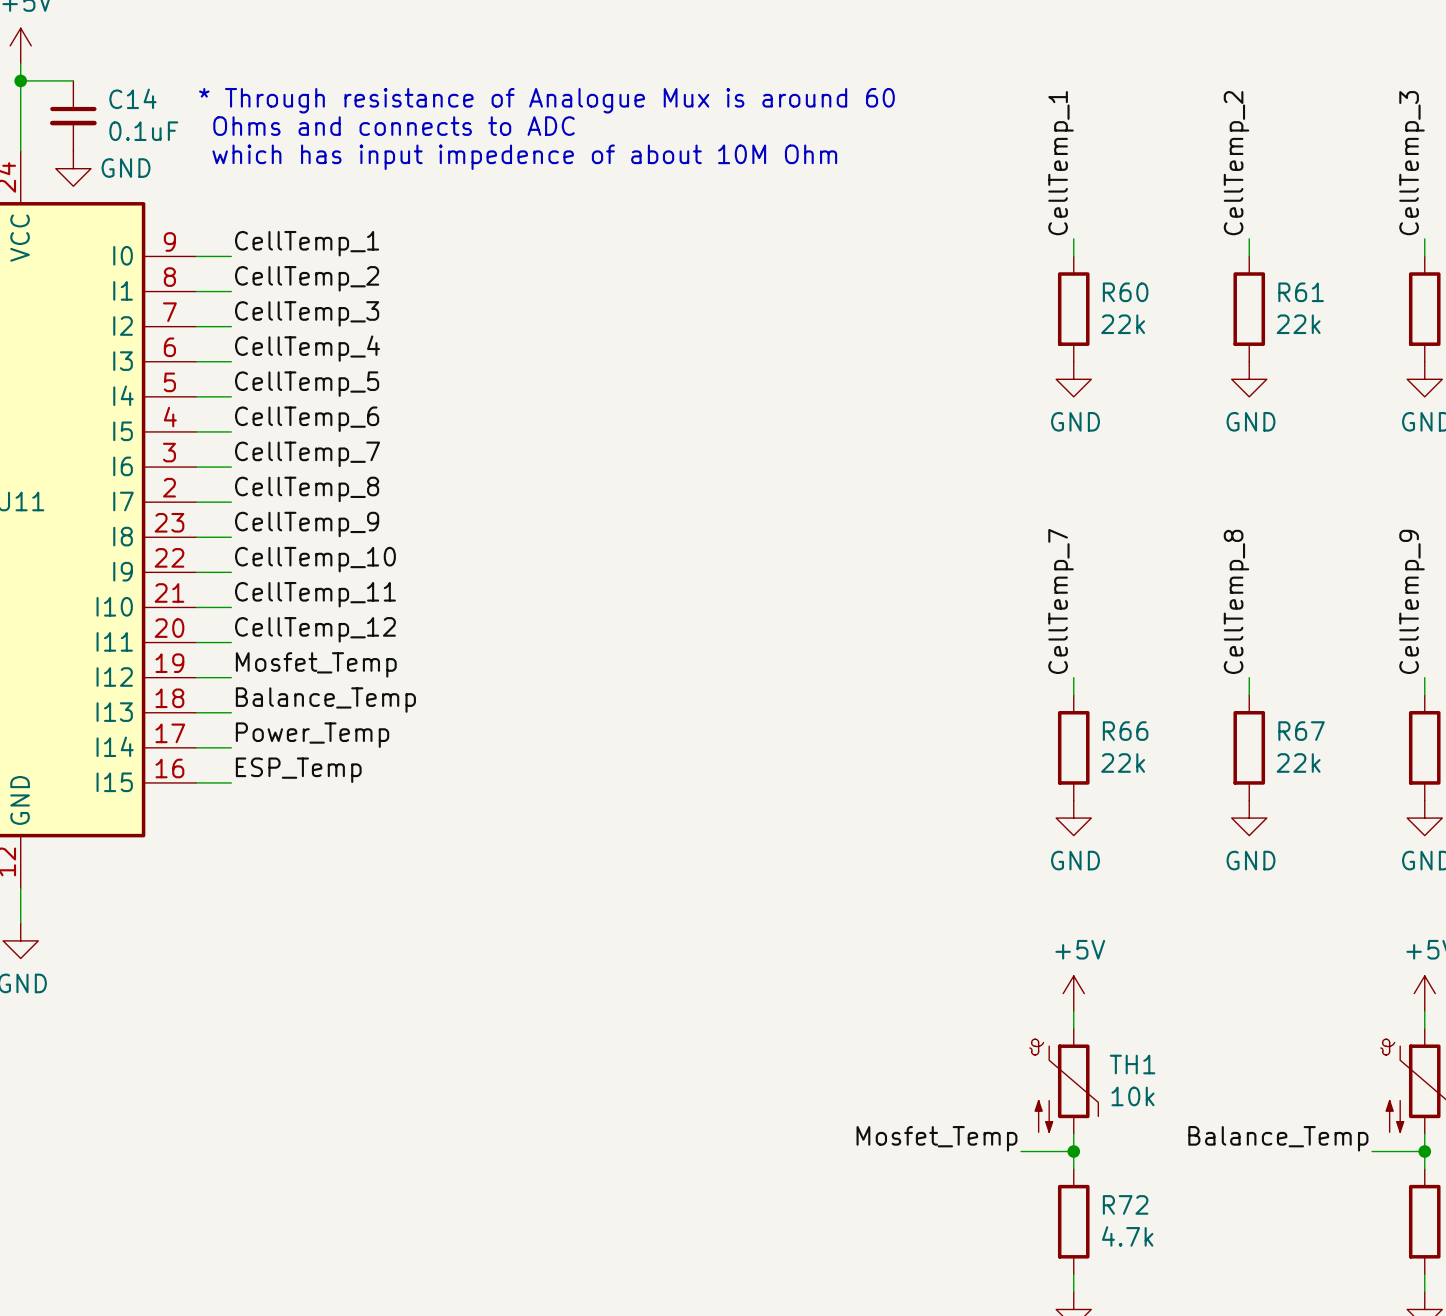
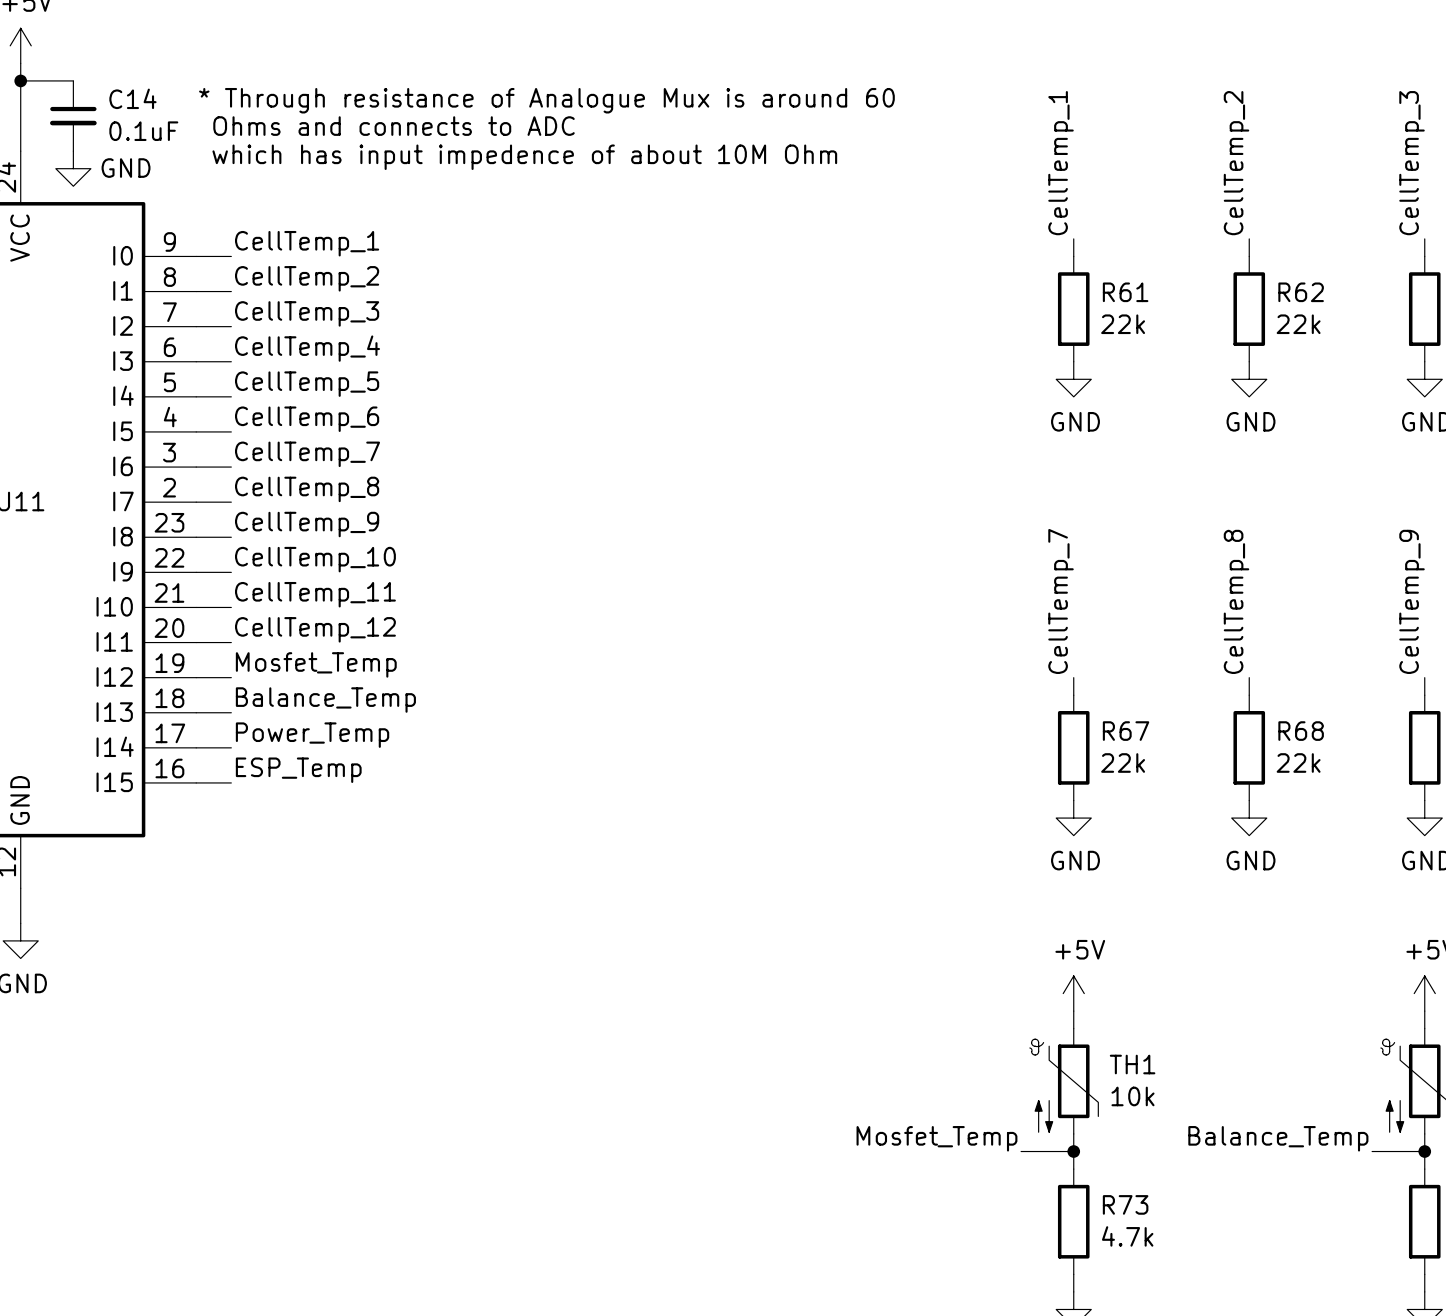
R60 name: R60 (1125, 292) -> R61 (1125, 292)
R61 name: R61 (1301, 292) -> R62 (1301, 292)
R66 name: R66 (1125, 731) -> R67 (1126, 731)
R67 name: R67 (1301, 731) -> R68 (1301, 731)
R72 name: R72 (1125, 1204) -> R73 (1125, 1204)

